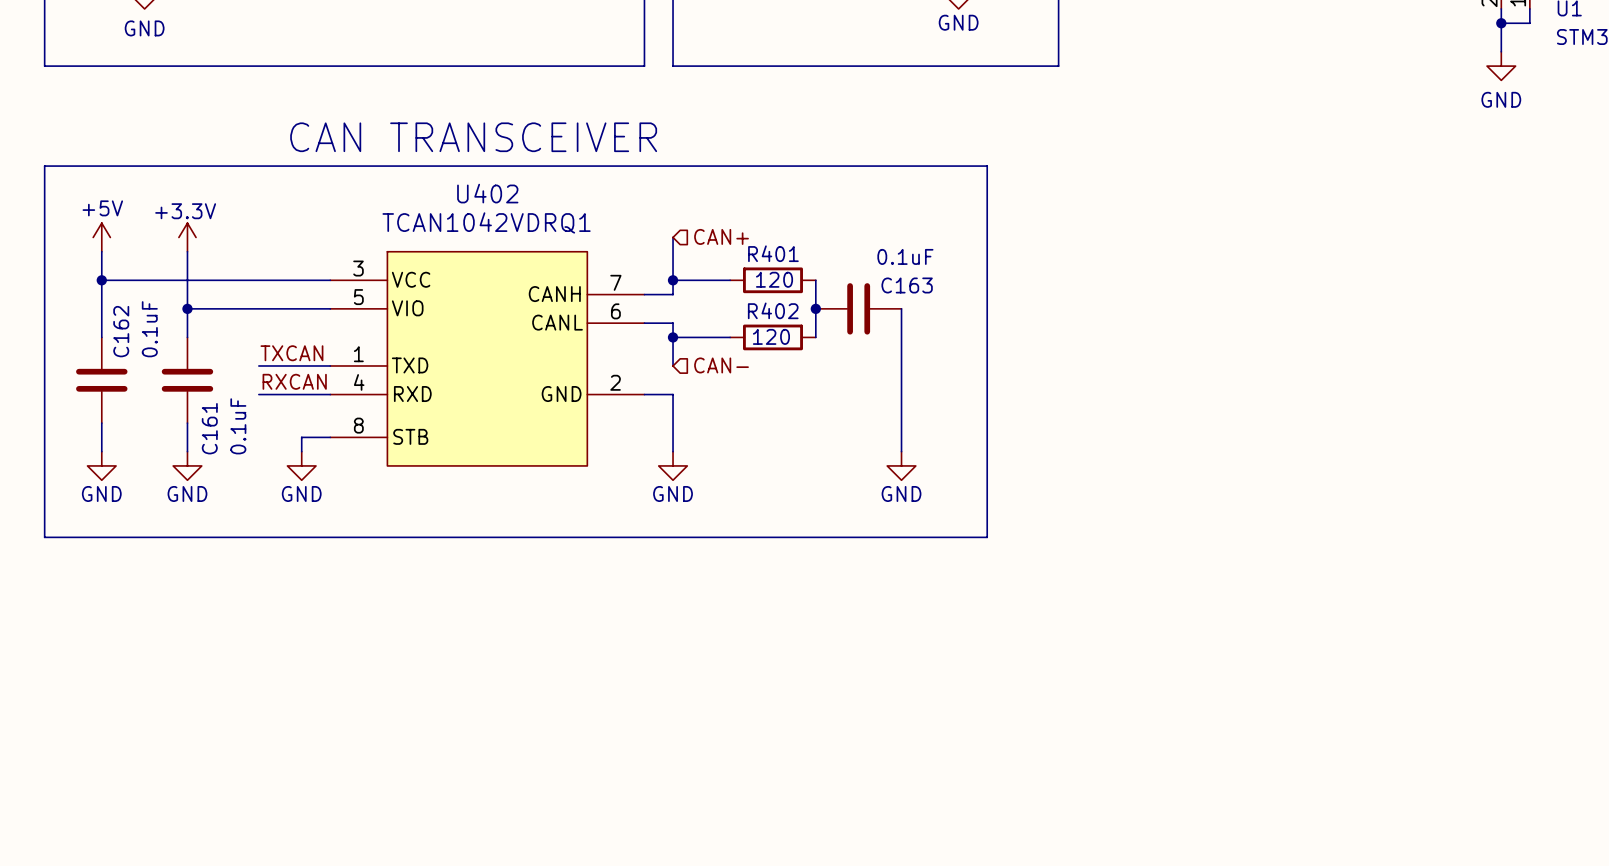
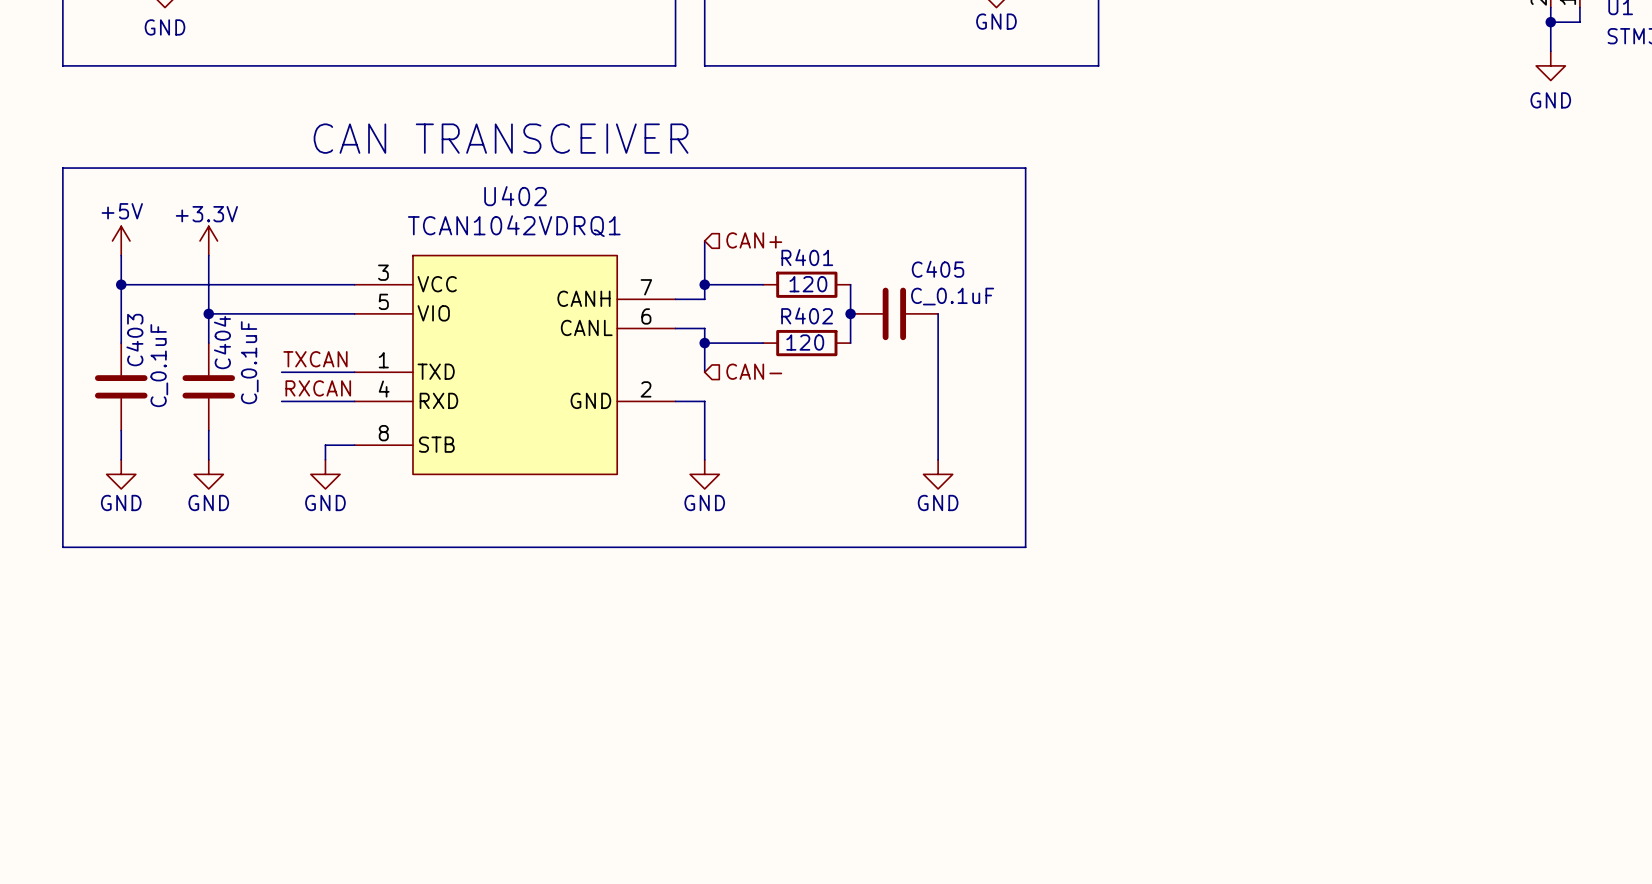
C163 value: 0.1uF (905, 256) -> C_0.1uF (952, 296)
C163 name: C163 (907, 285) -> C405 (938, 269)
C162 value: 0.1uF (149, 329) -> C_0.1uF (159, 365)
C162 name: C162 (121, 331) -> C403 (134, 340)
C161 value: 0.1uF (238, 426) -> C_0.1uF (249, 362)
C161 name: C161 (209, 428) -> C404 (222, 342)

